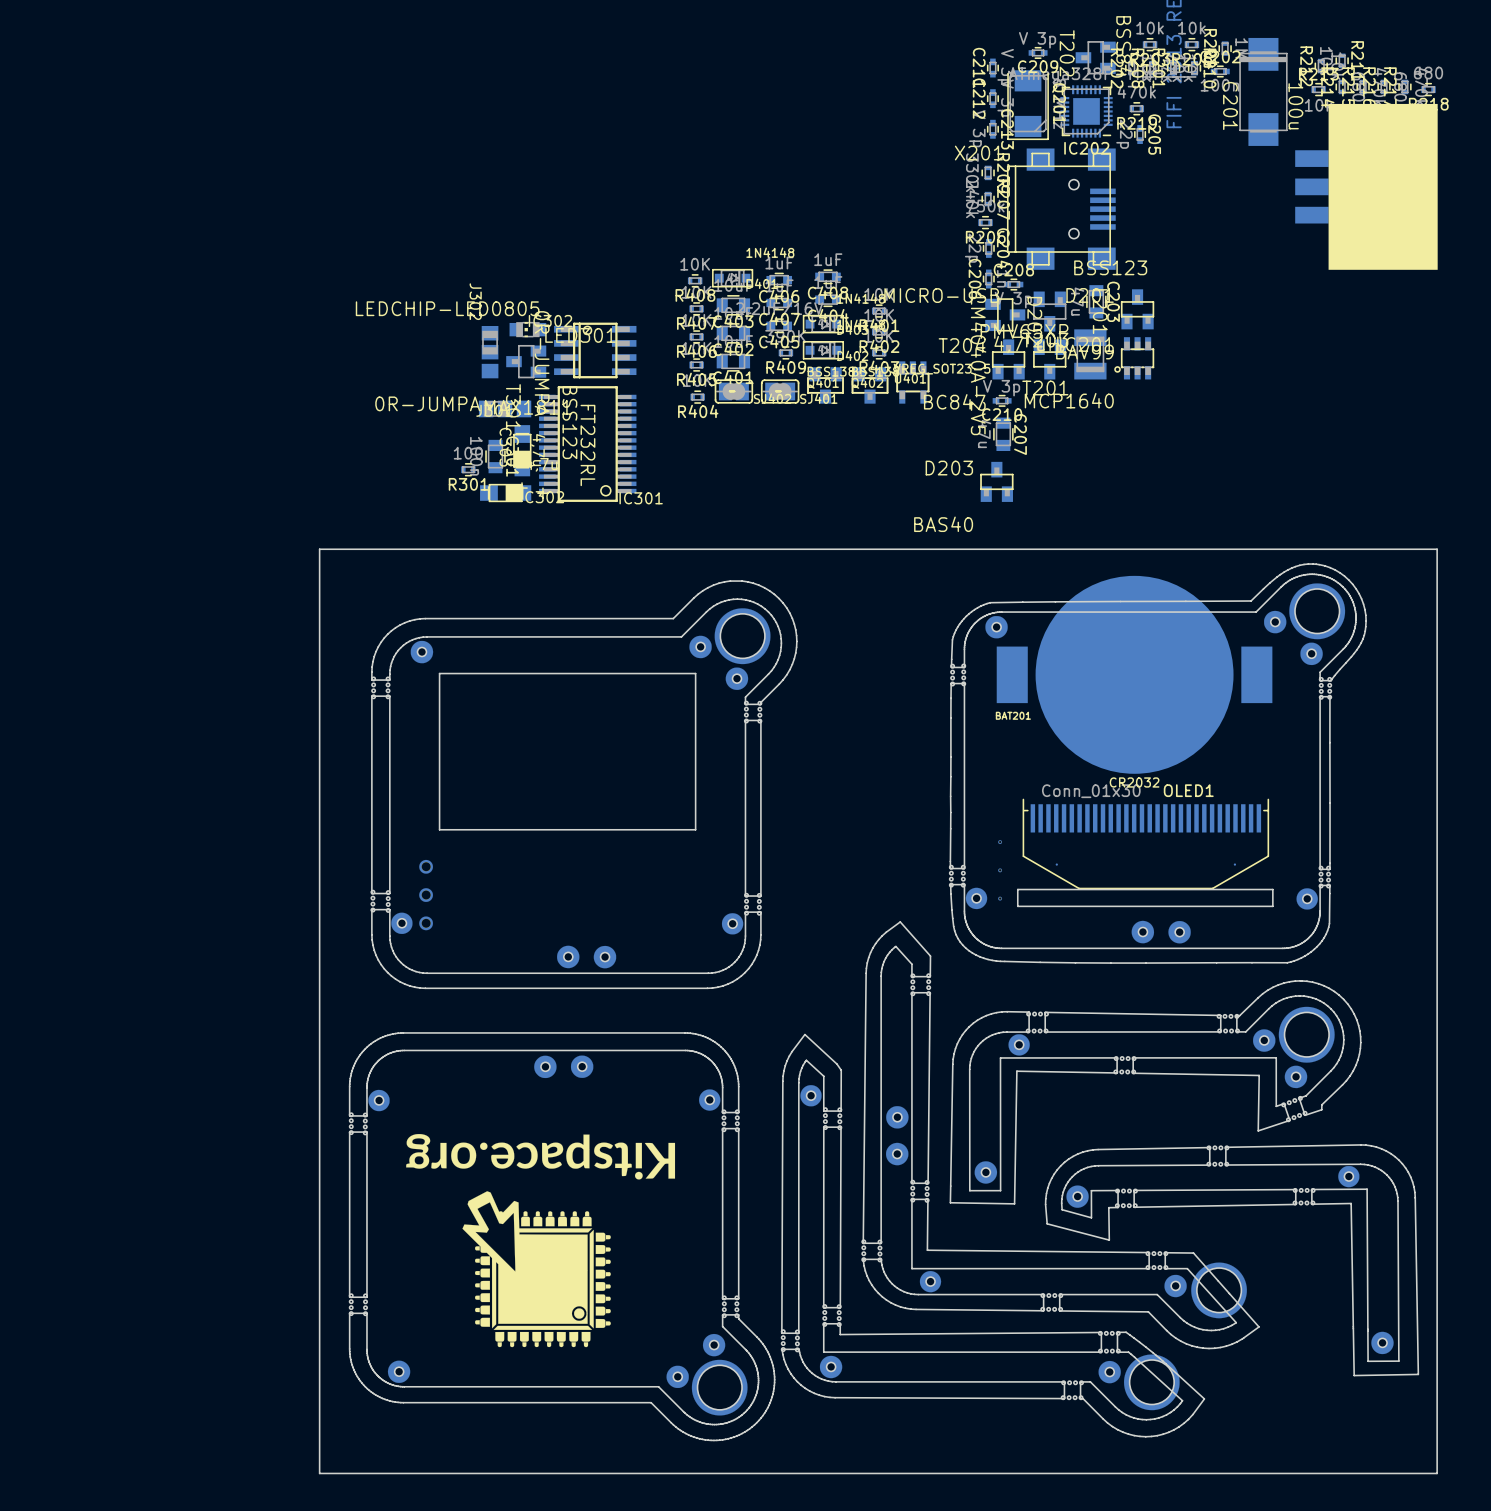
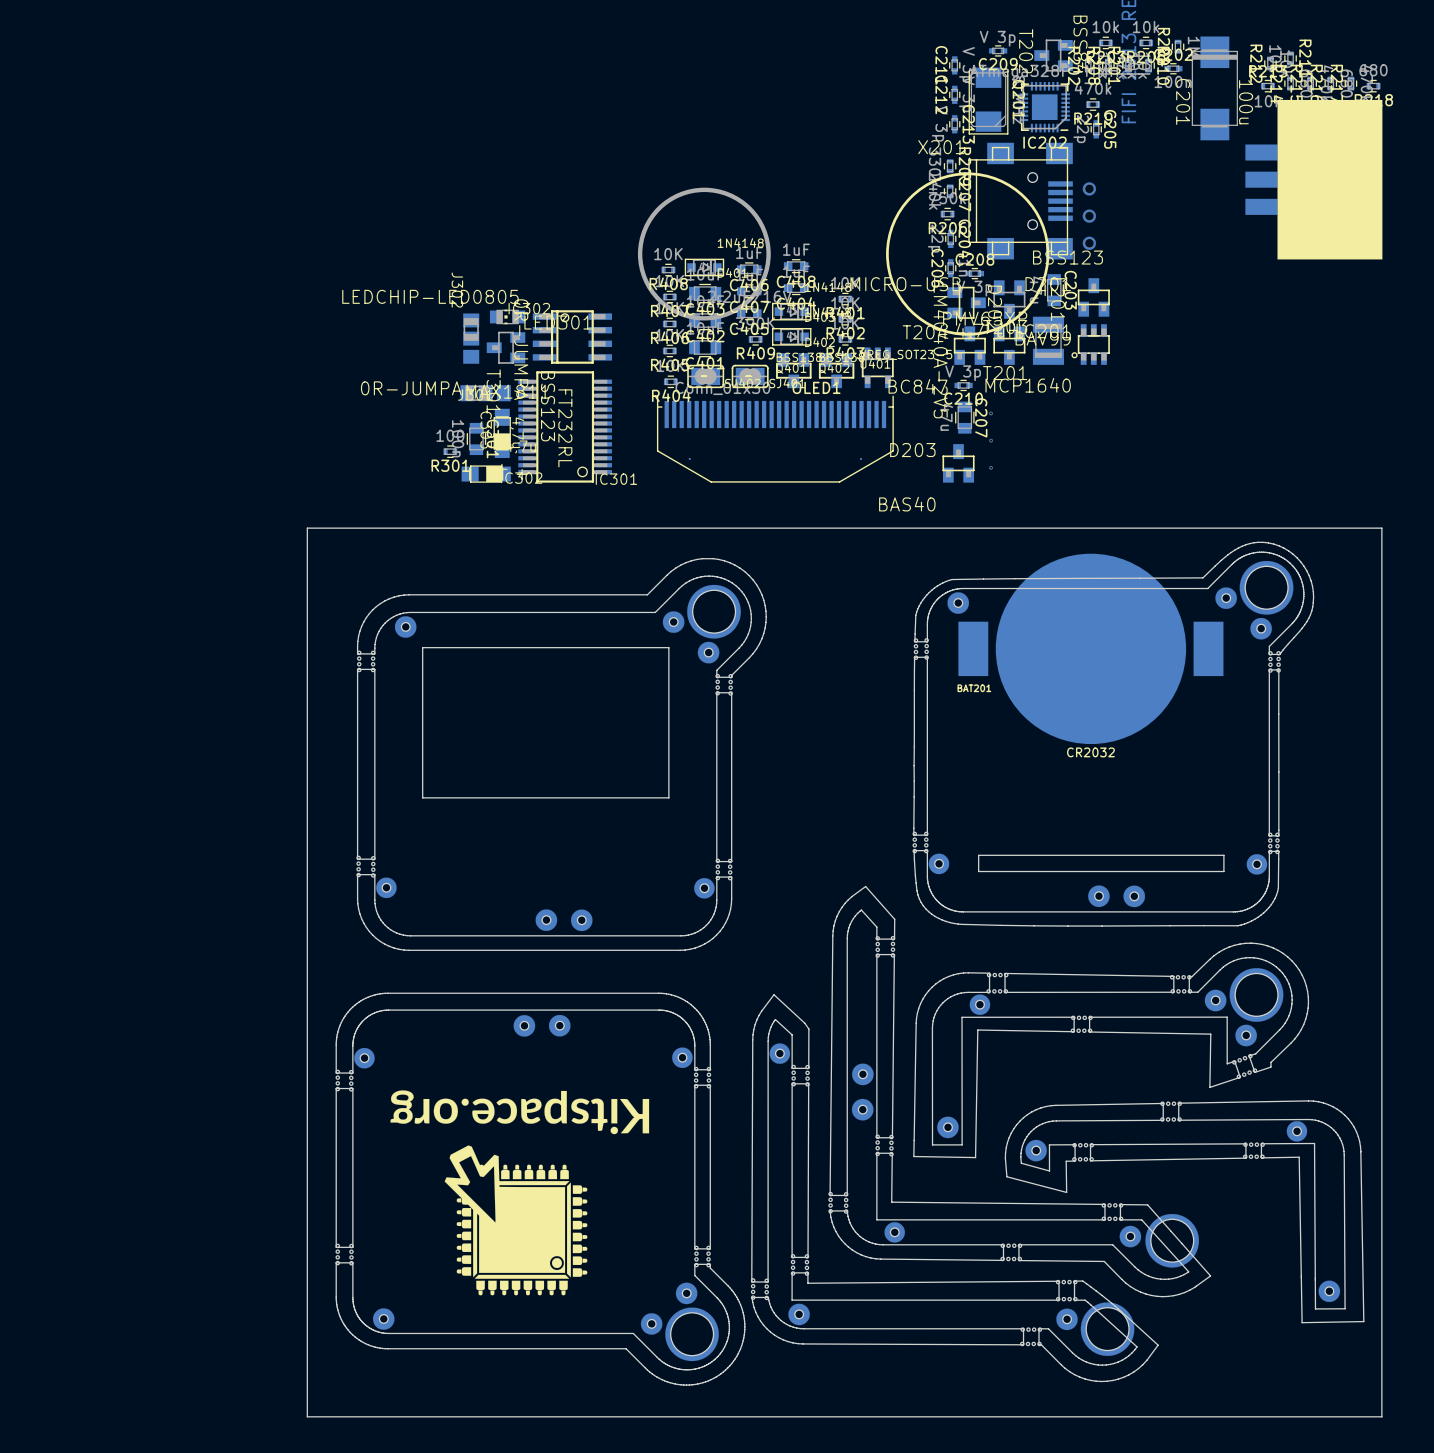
drawing: none -> [886, 172, 1050, 336]
drawing: none -> [637, 187, 771, 321]
part: none -> (1089, 216)
part: none -> (991, 440)
OLED1 position: (1145, 843) -> (775, 439)
part: (1000, 870) -> none
part: (426, 895) -> none

